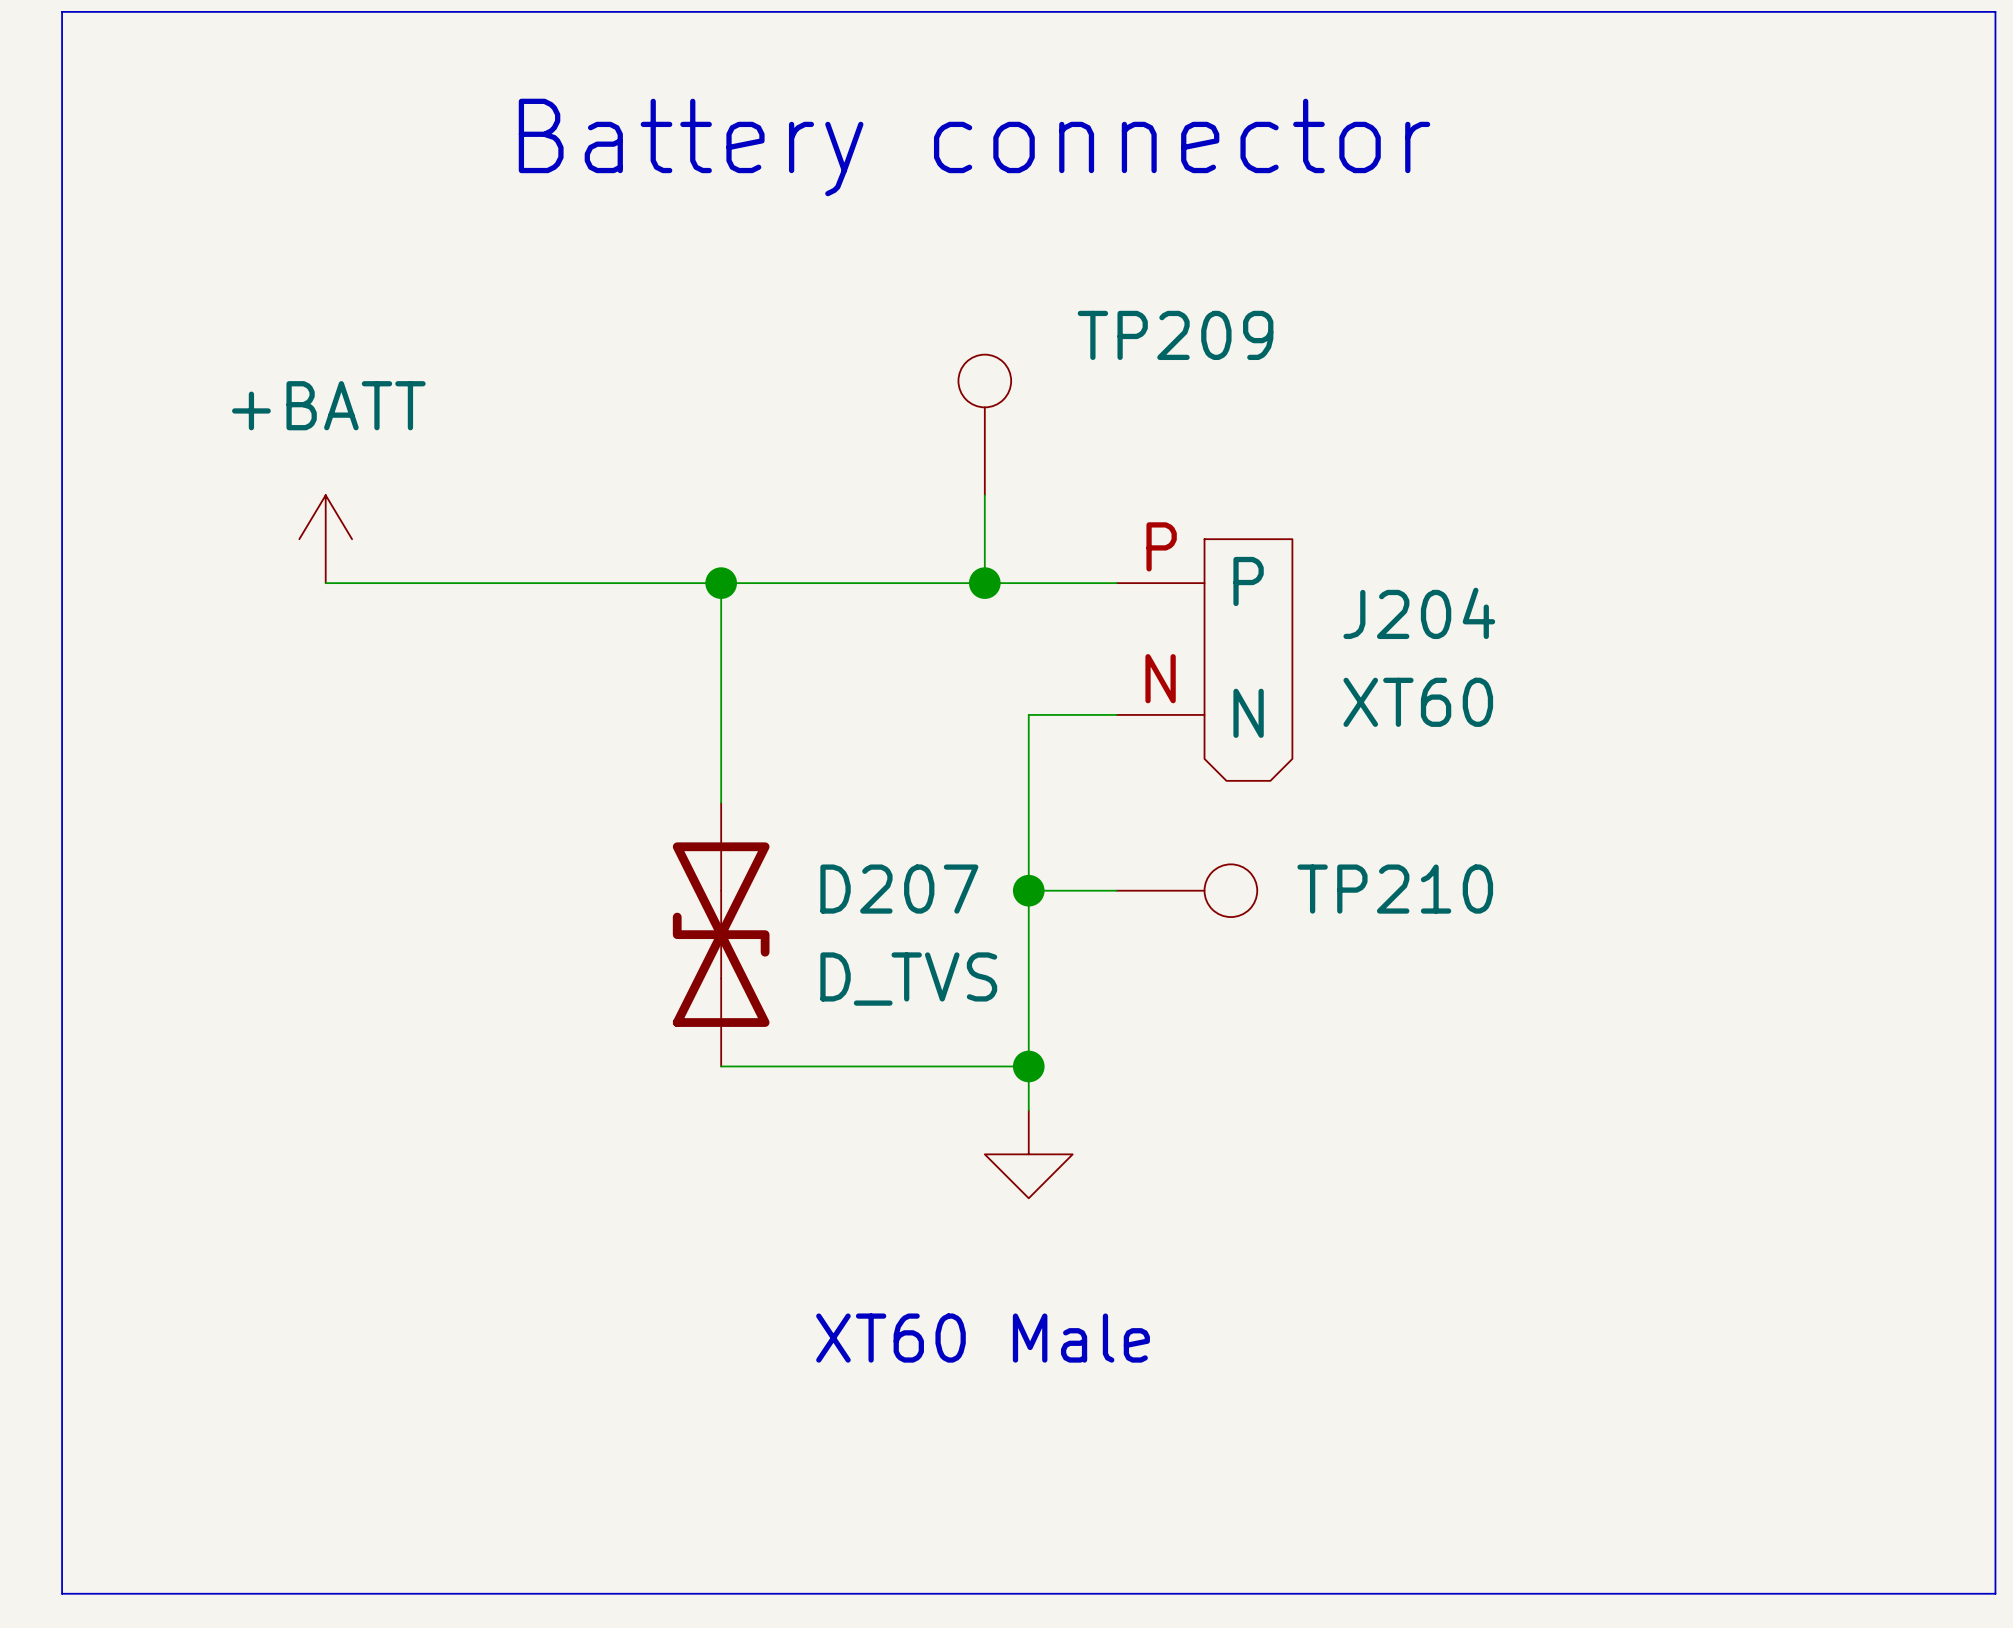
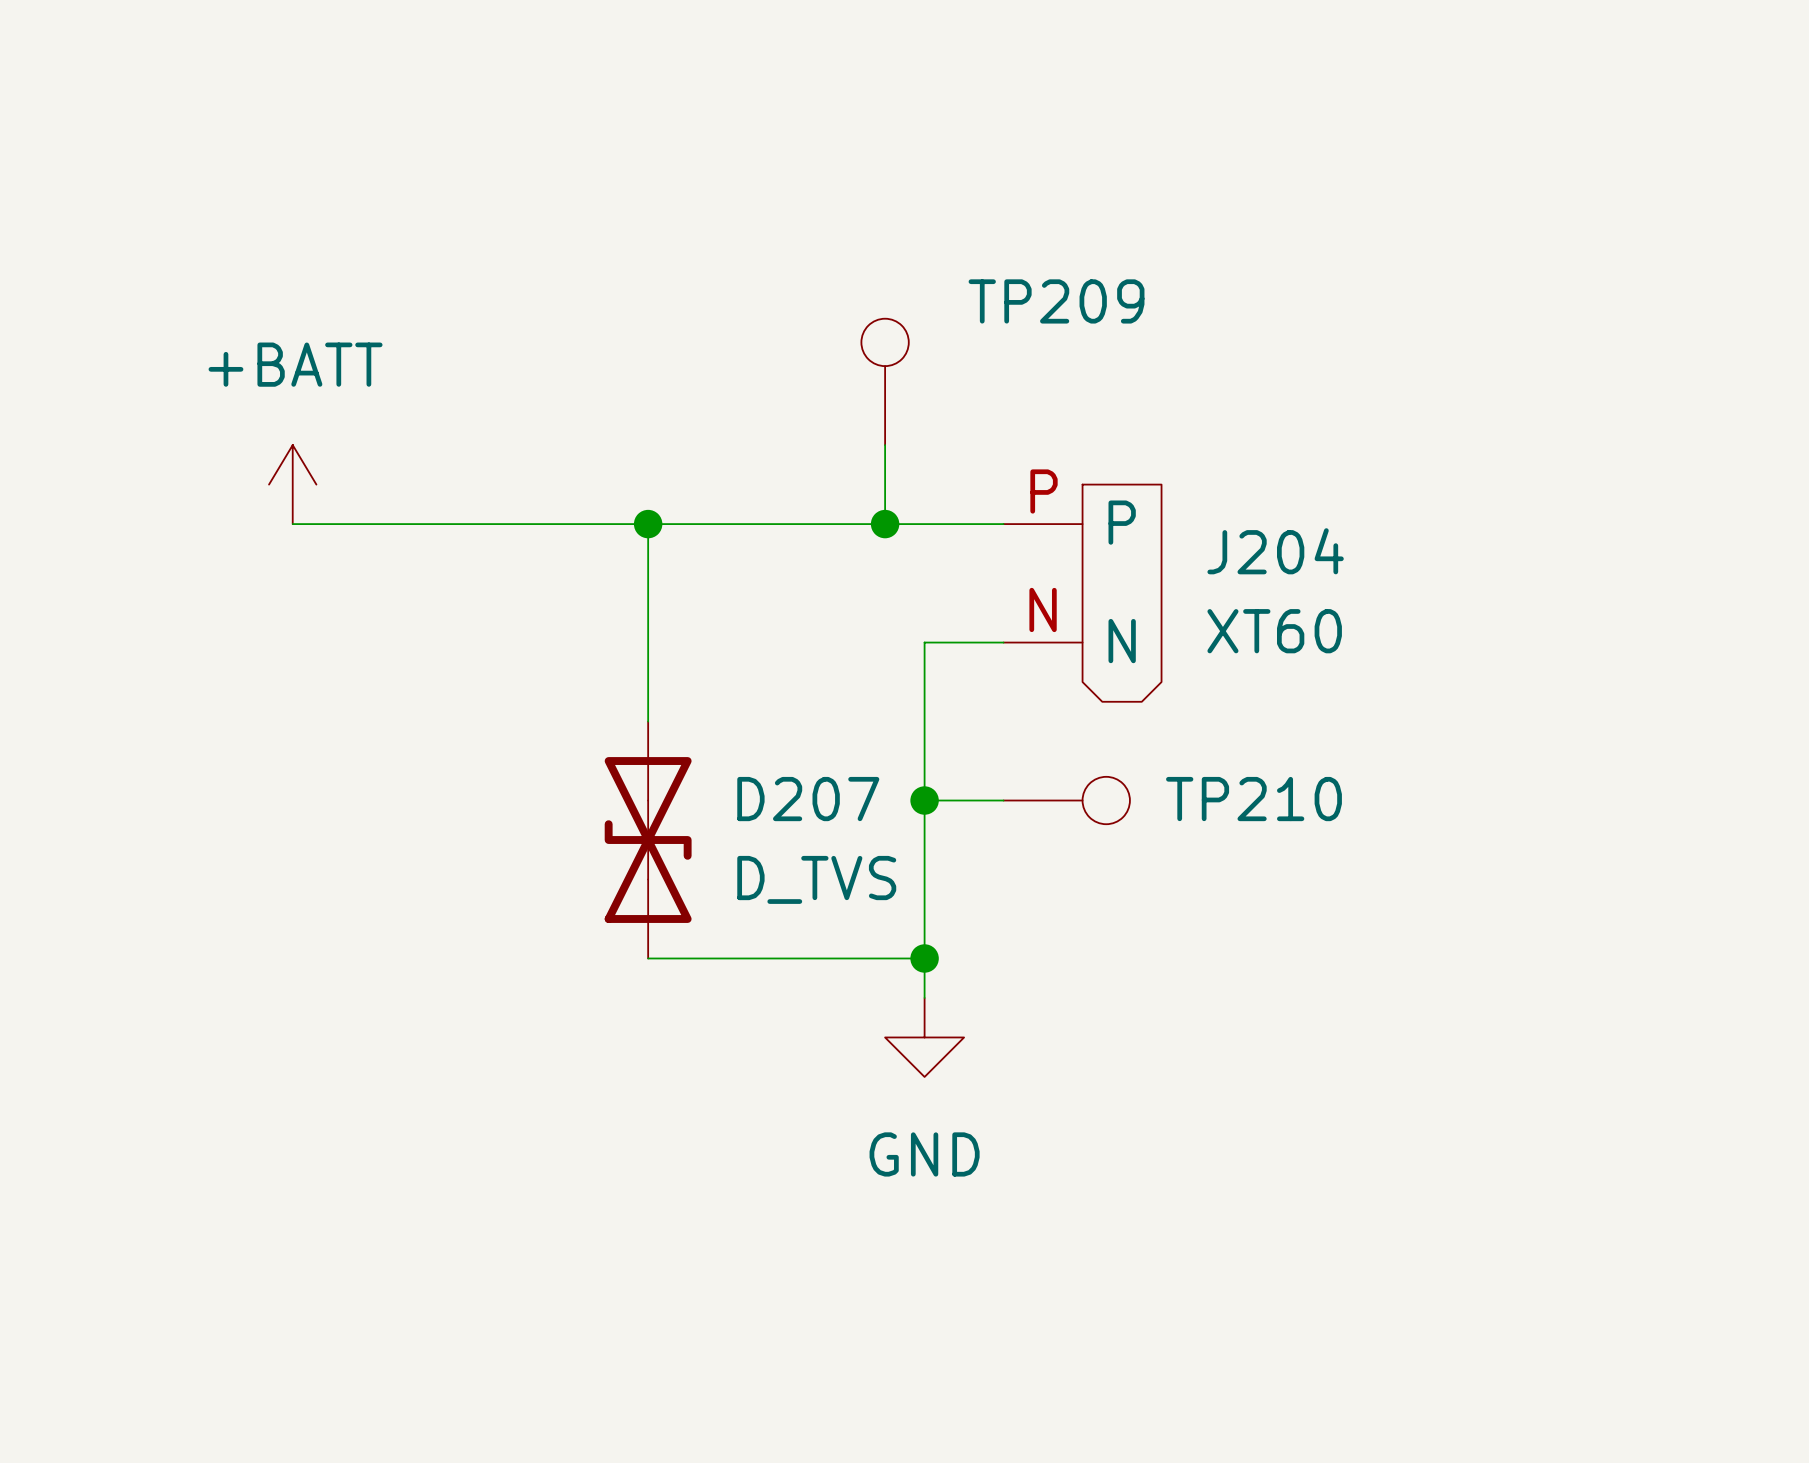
line: (62, 11) (62, 1593) (1995, 1593) (1995, 11) (62, 11) -> none
text: Battery connector (974, 147) -> none
power symbol text: none -> GND (924, 1154)
text: XT60 Male (983, 1338) -> none

